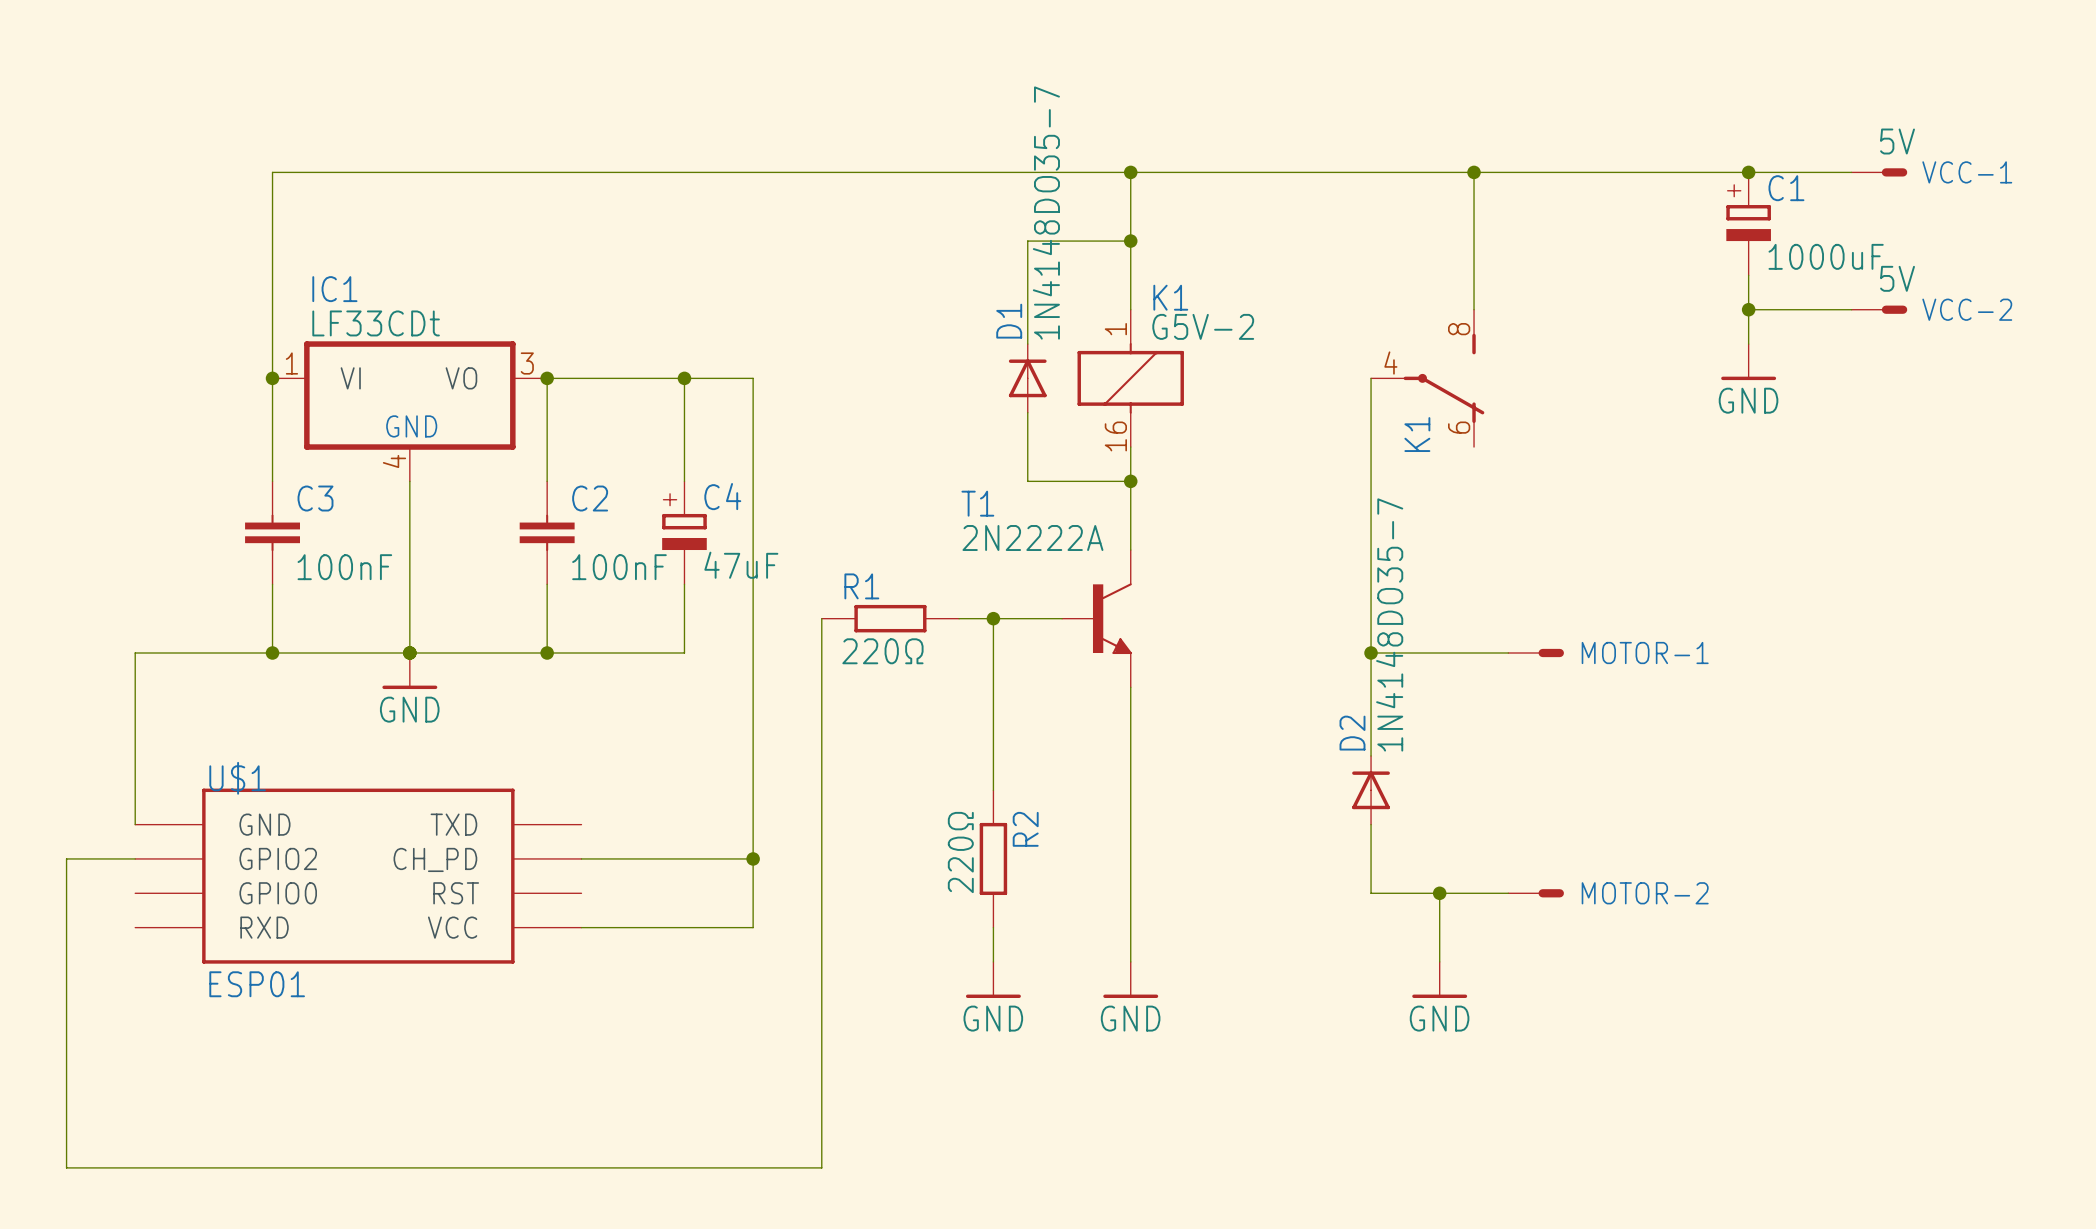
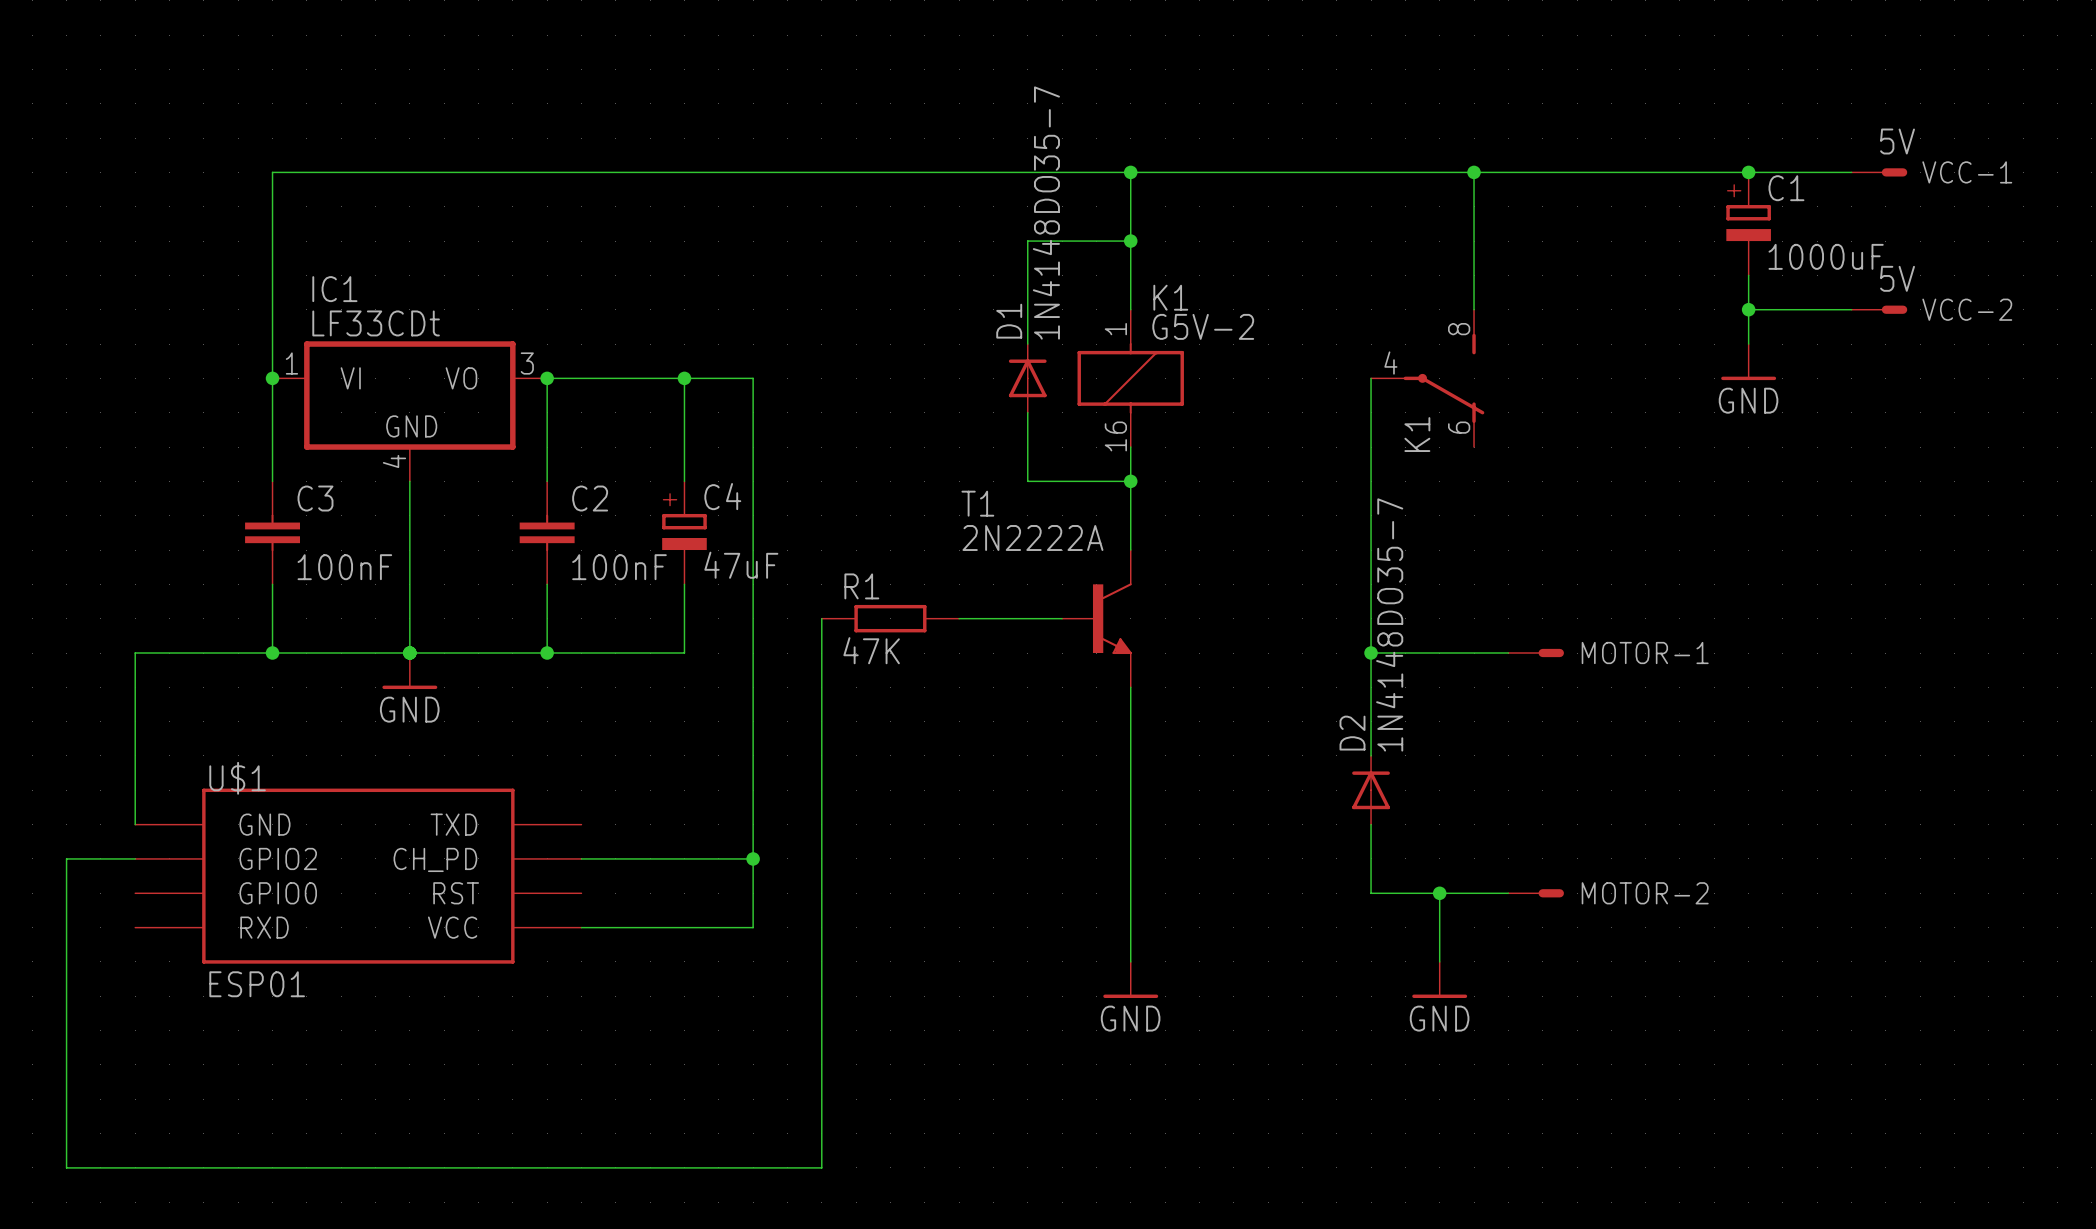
wire: (993, 618) (993, 790) -> none
junction: (993, 618) -> none
R1 value: 220Ω (882, 651) -> 47K (871, 650)
R2: 220Ω (993, 858) -> none
wire: (993, 927) (993, 961) -> none
power symbol: GND (993, 979) -> none

